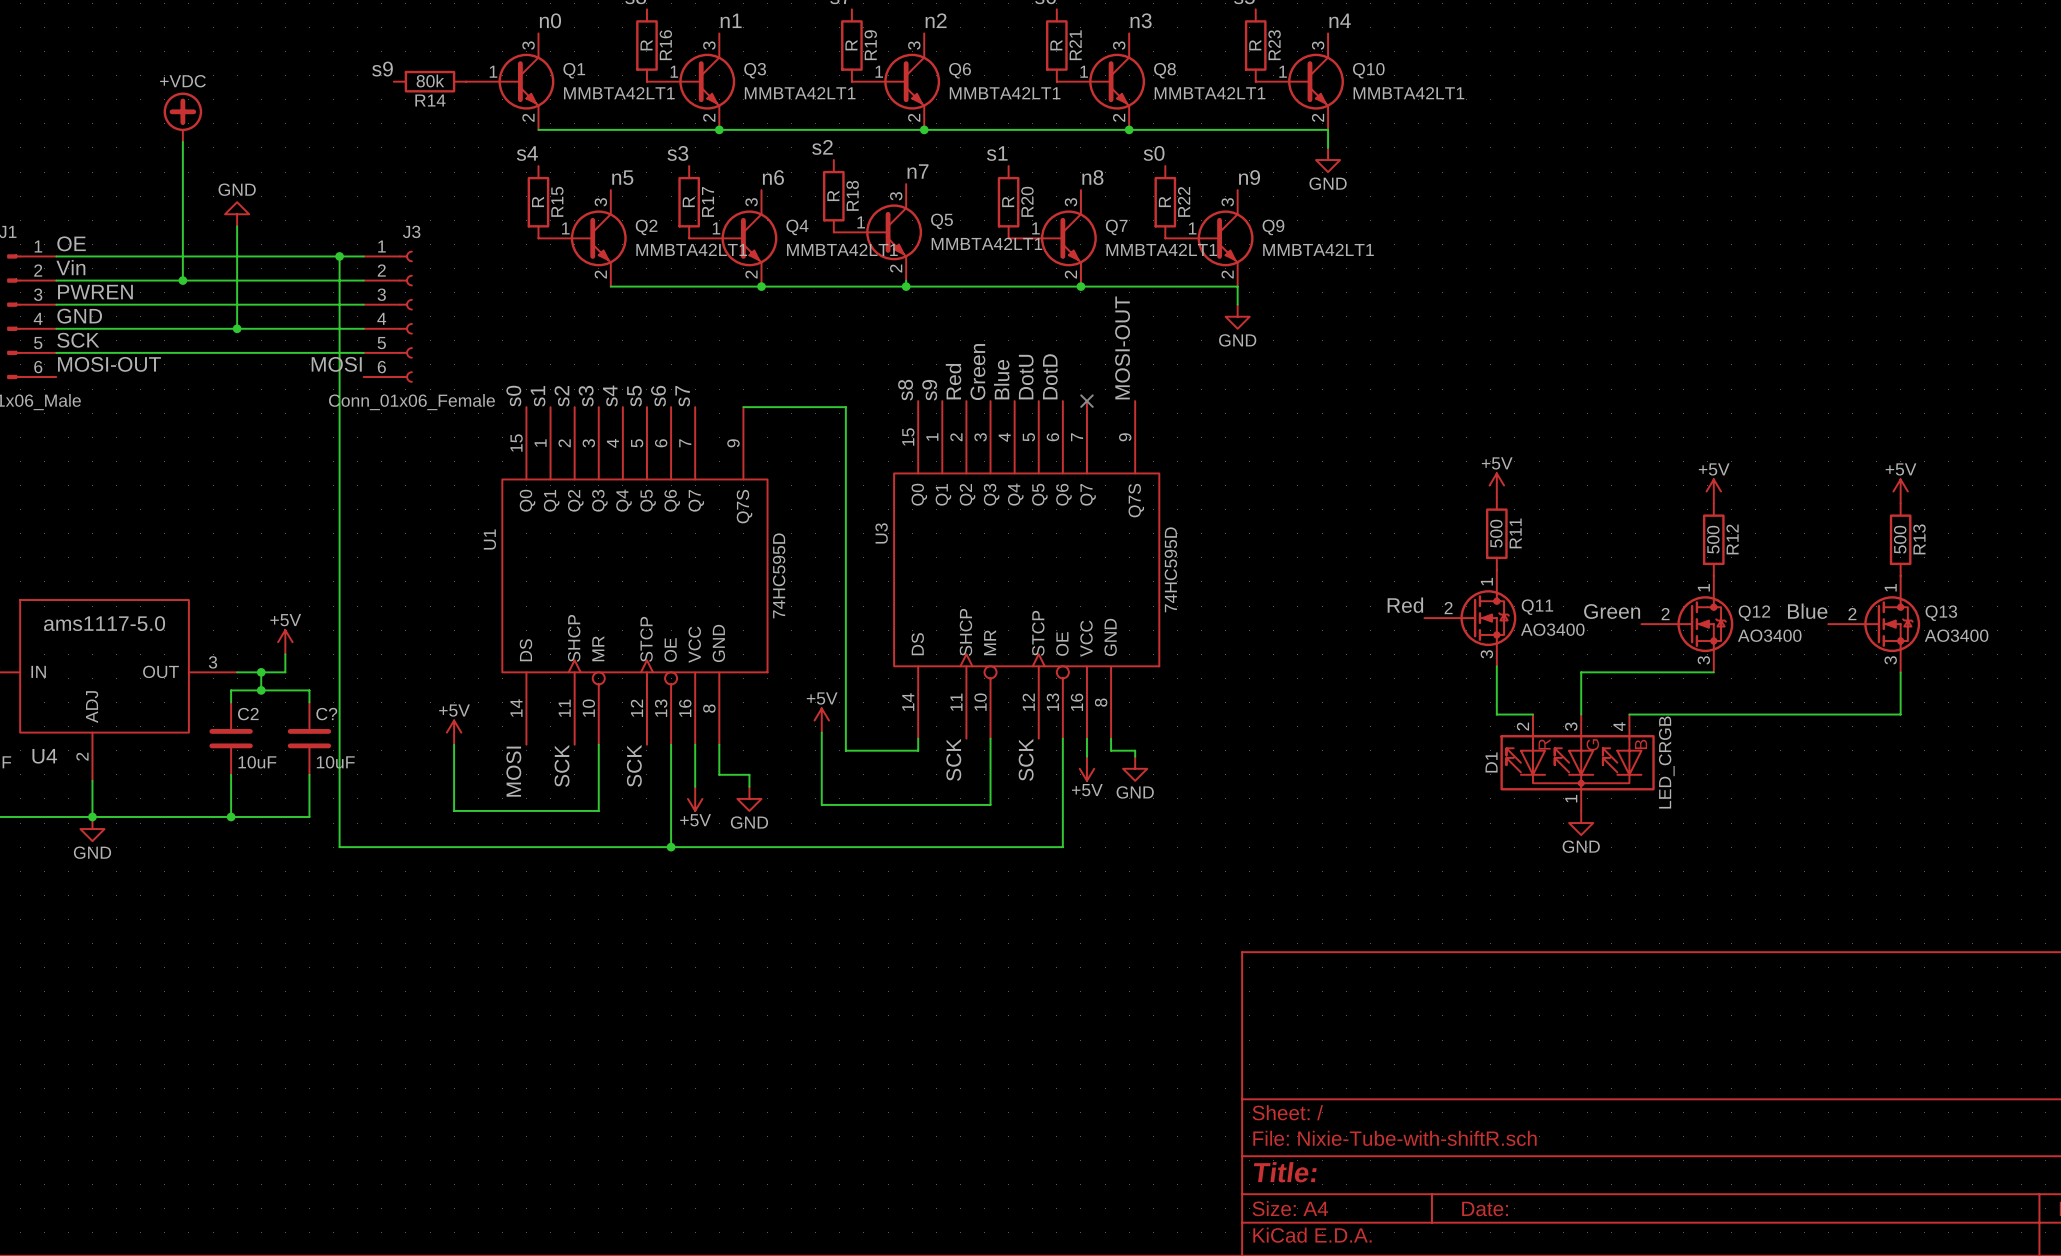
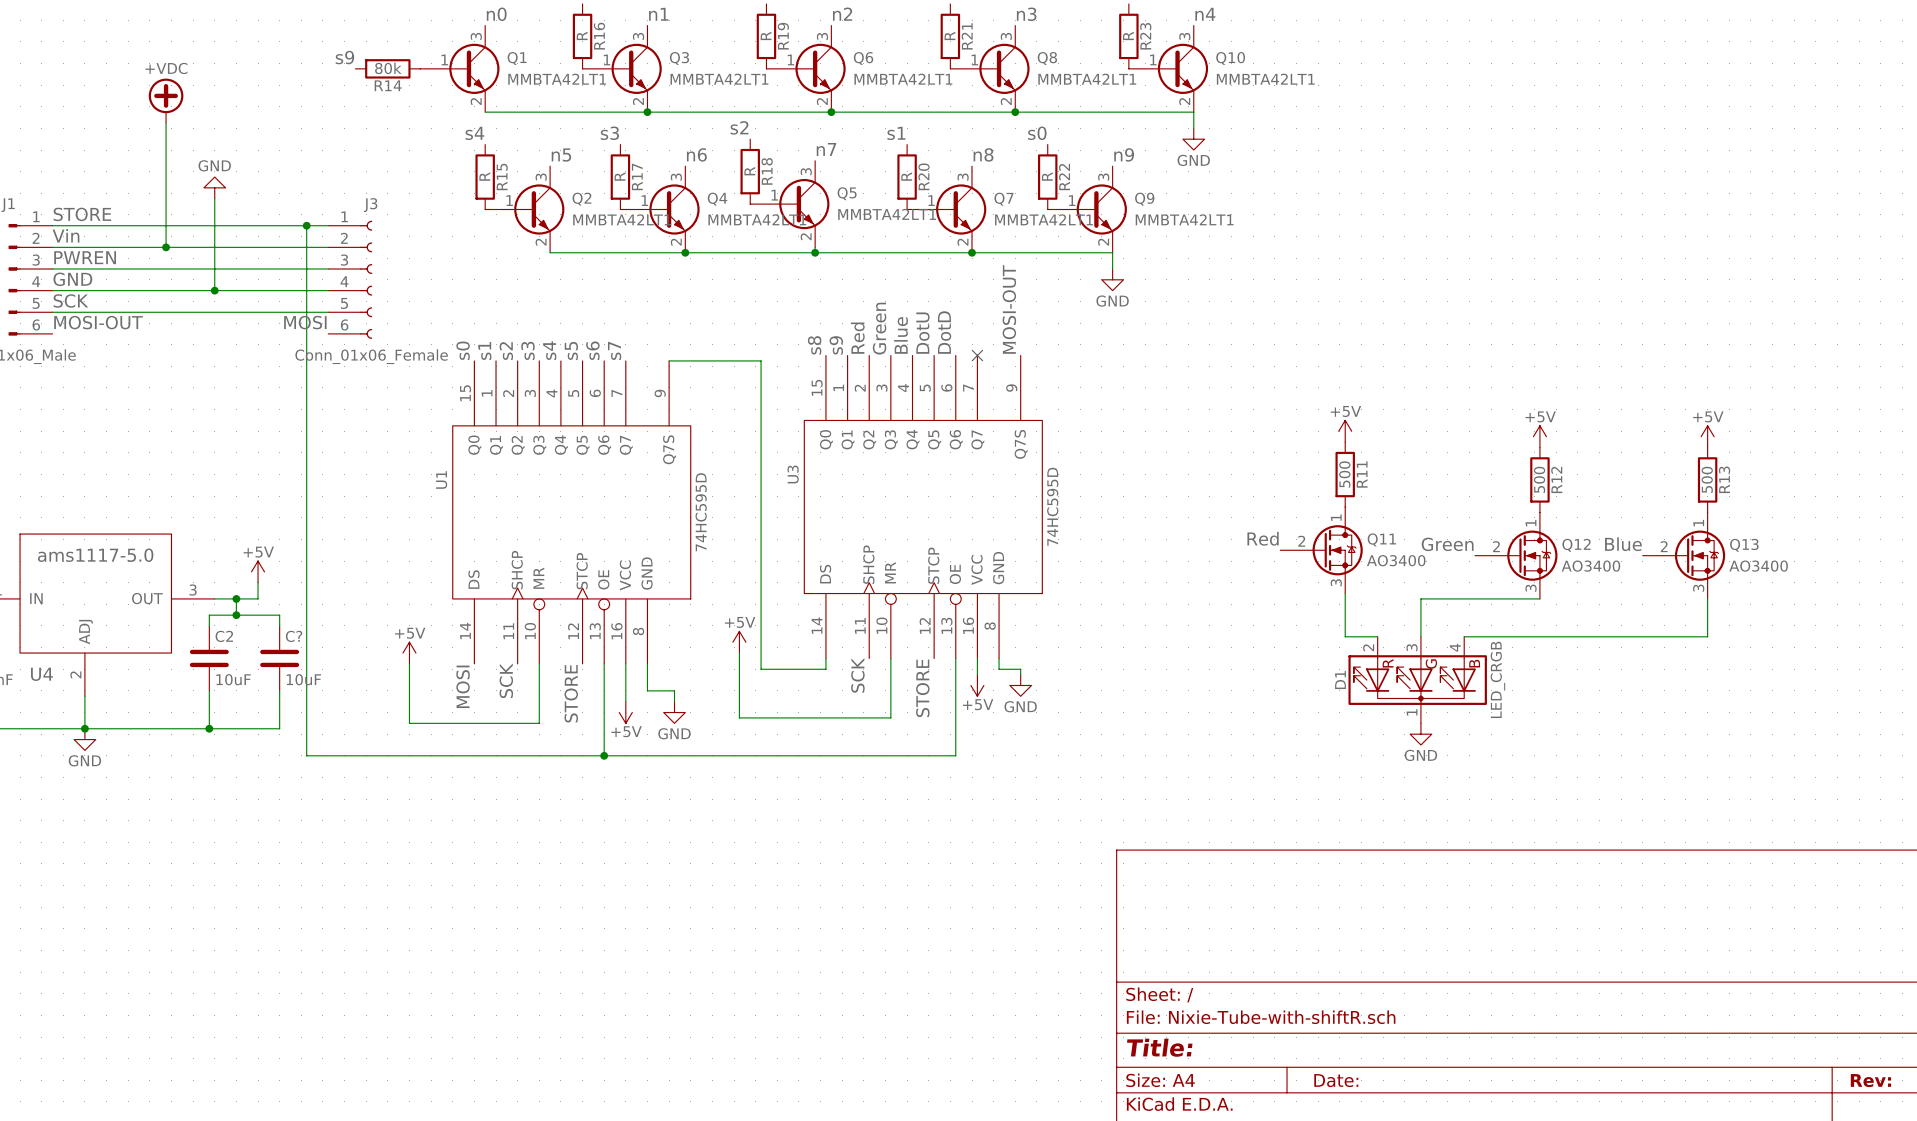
label: OE (71, 243) -> STORE (82, 214)
label: SCK (1026, 759) -> STORE (922, 688)
label: SCK (634, 765) -> STORE (571, 693)

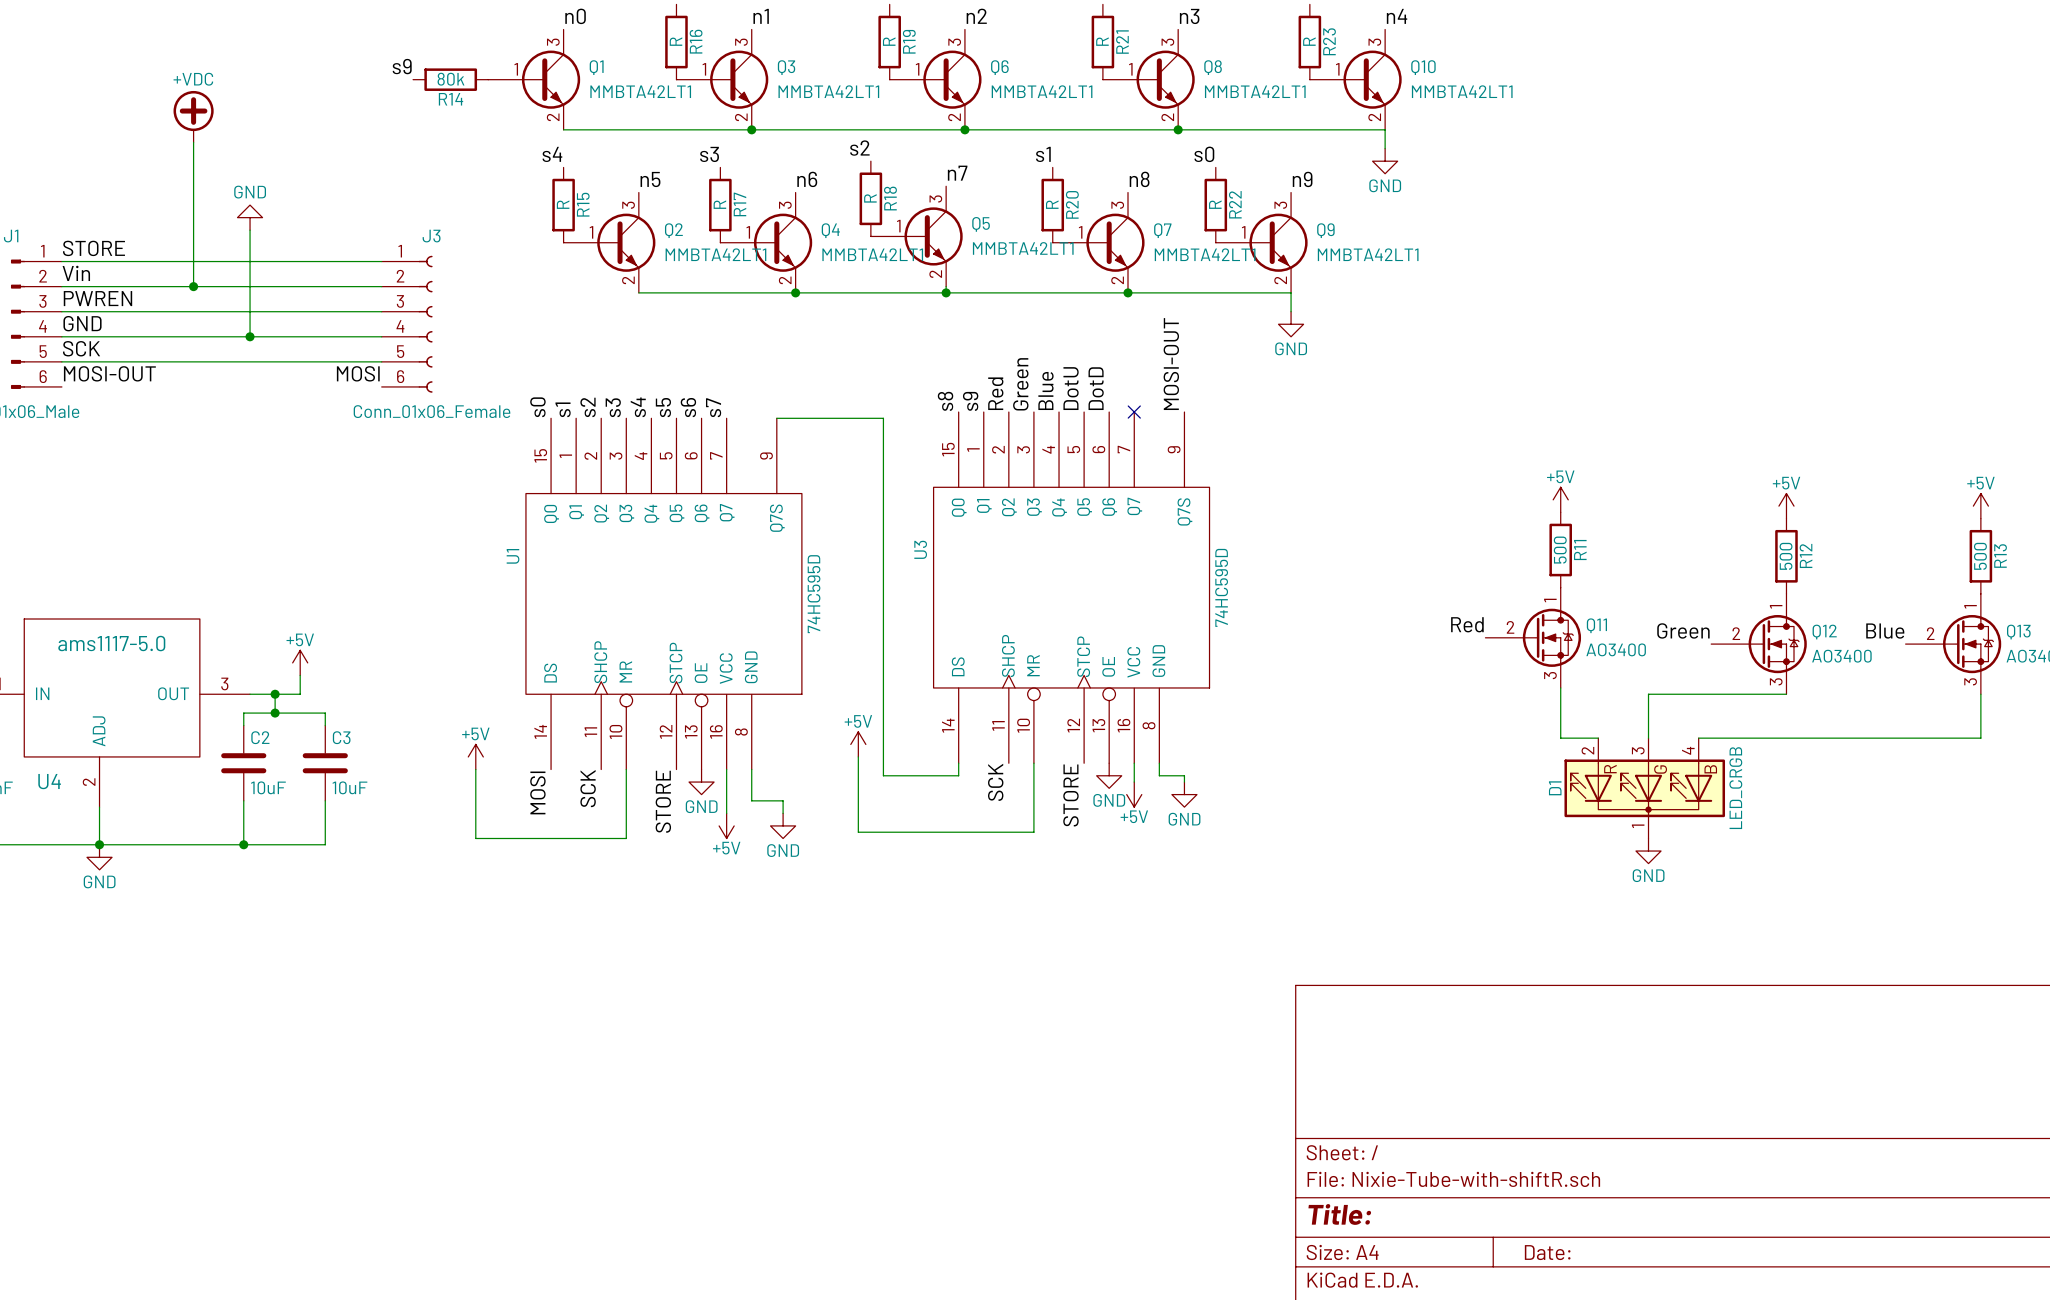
wire: (306, 225) (306, 755) (955, 755) (955, 658) -> none
junction: (306, 225) -> none
C? name: C? (294, 636) -> C3 (341, 737)
wire: (604, 663) (604, 755) -> none
power symbol: none -> GND (1109, 775)
power symbol: none -> GND (701, 782)
junction: (604, 755) -> none

